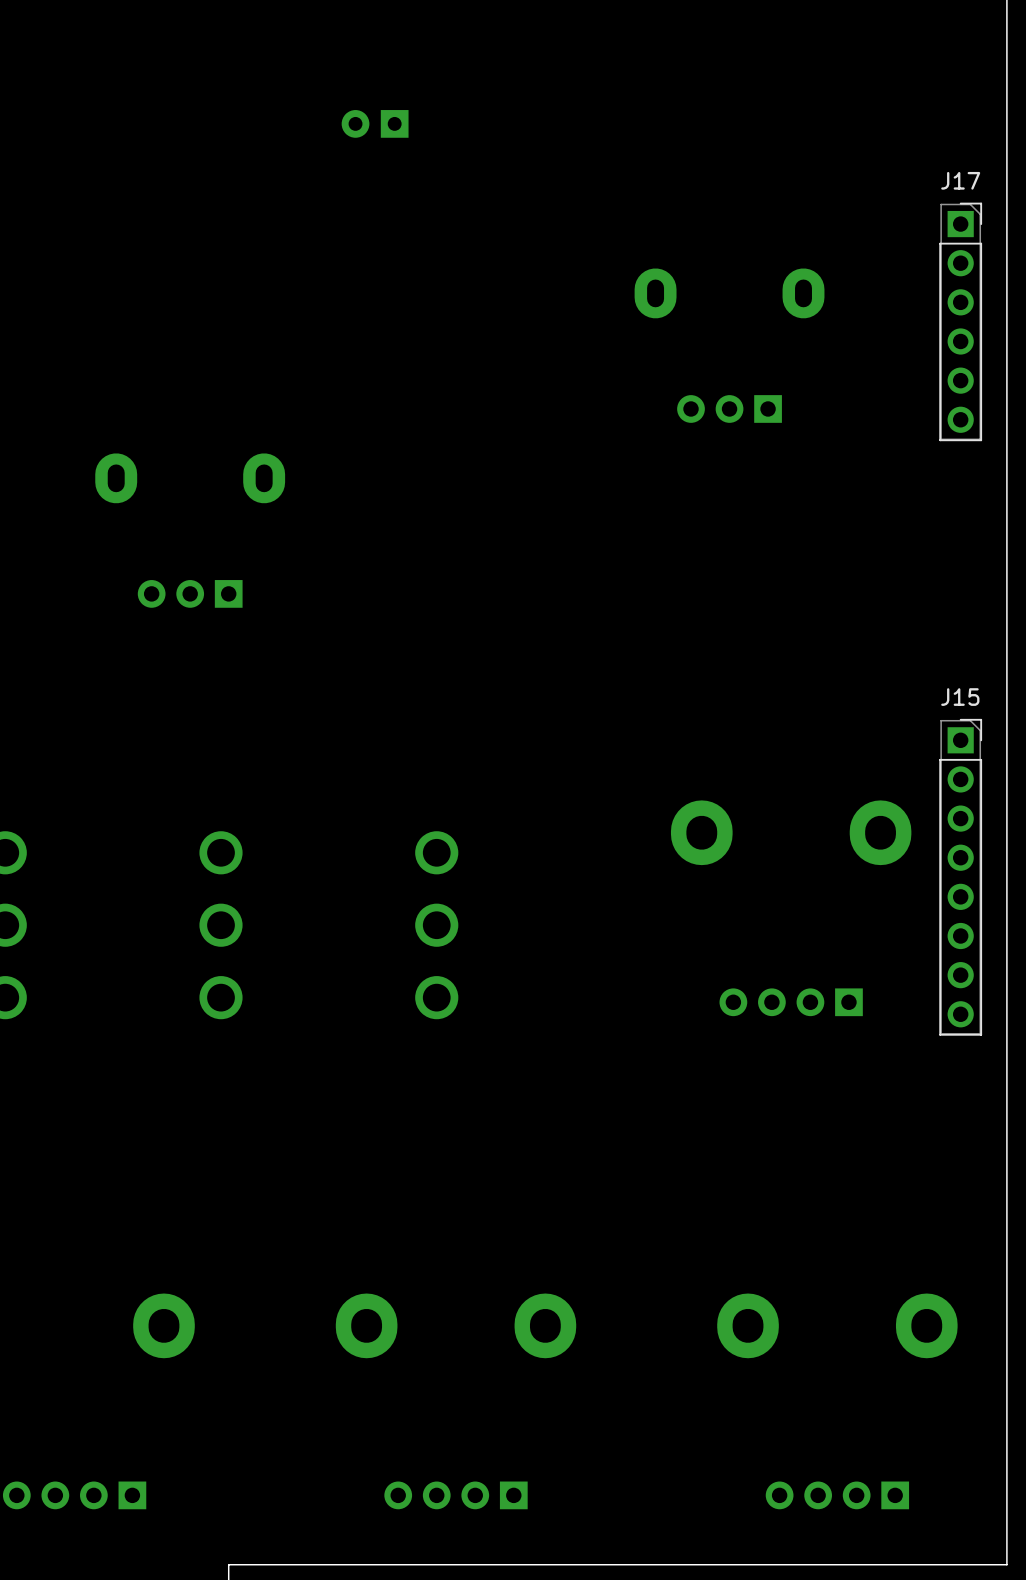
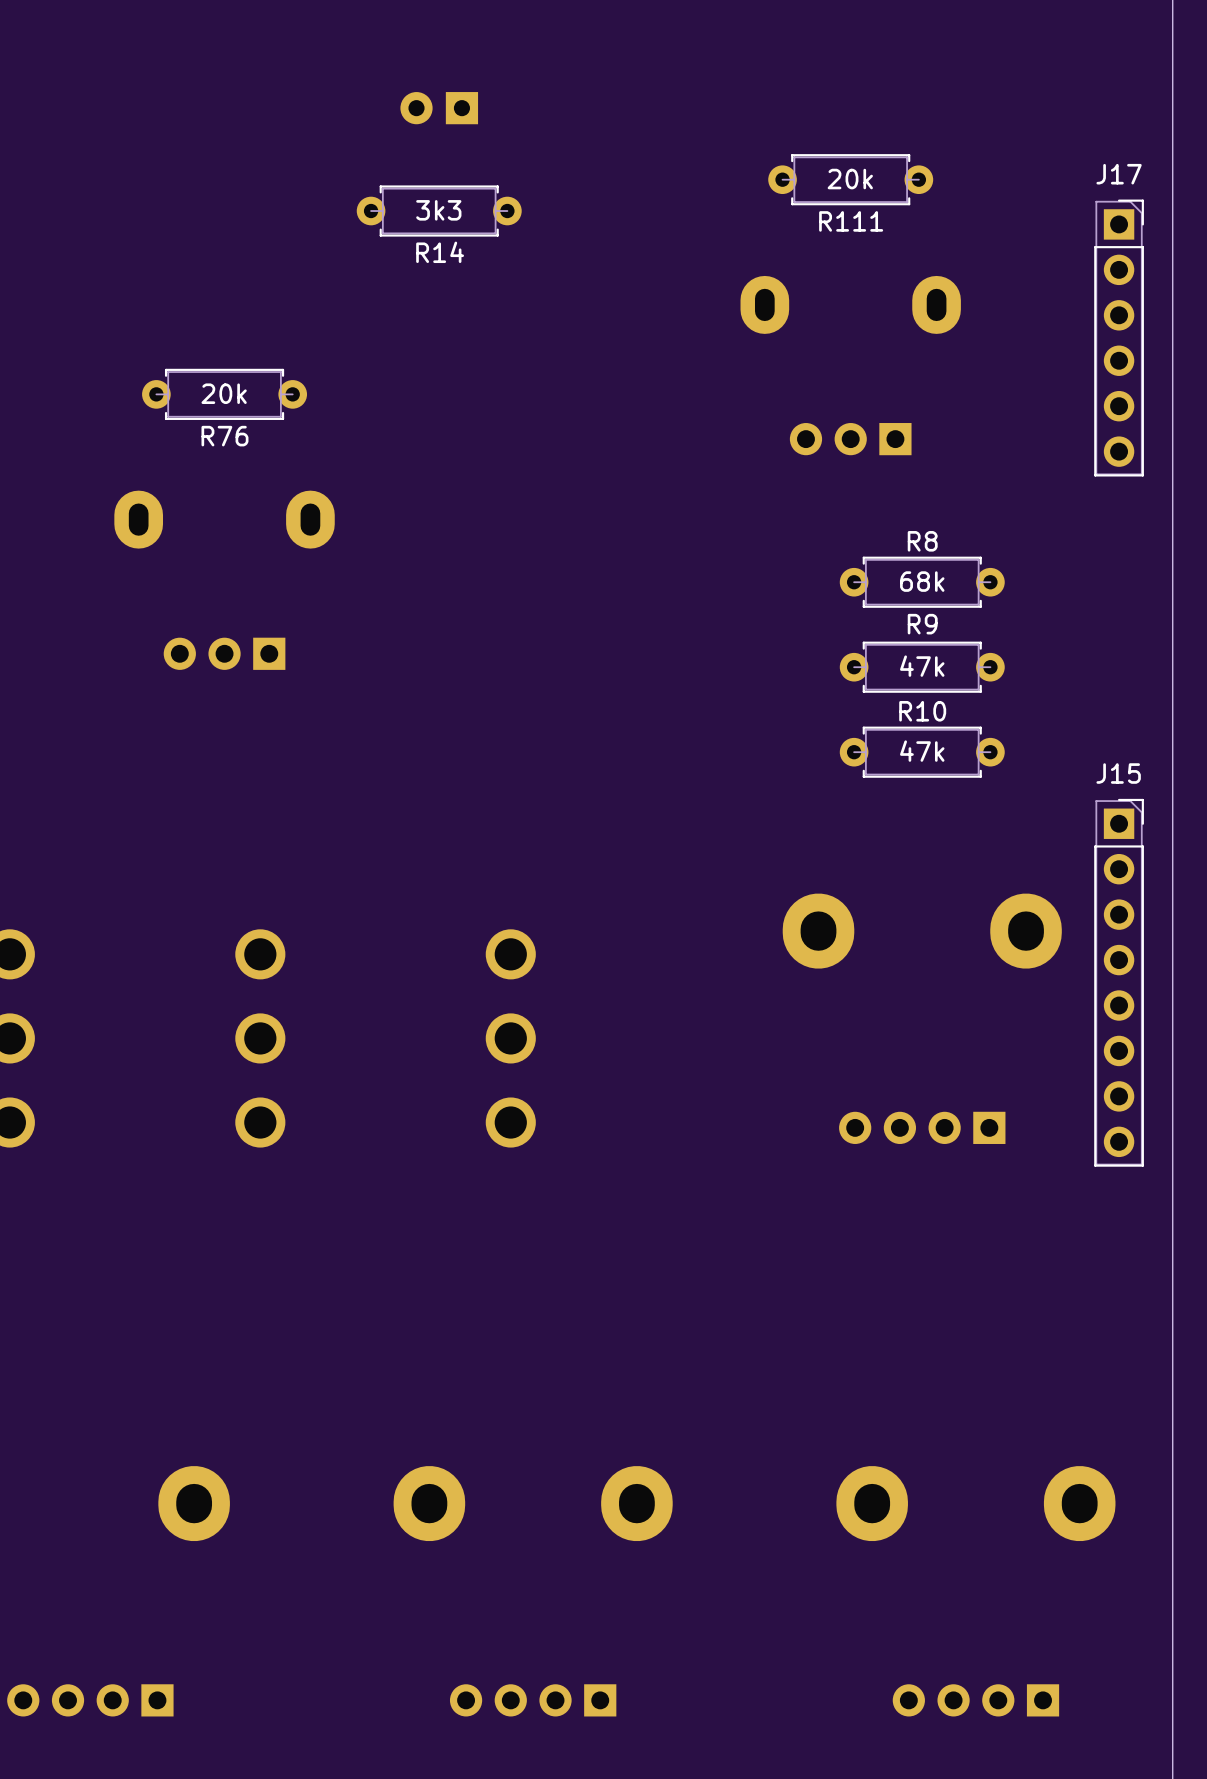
R111: none -> 20k (850, 179)
R14: none -> 3k3 (439, 211)
R76: none -> 20k (224, 394)
R8: none -> 68k (922, 582)
R9: none -> 47k (922, 667)
R10: none -> 47k (922, 752)

